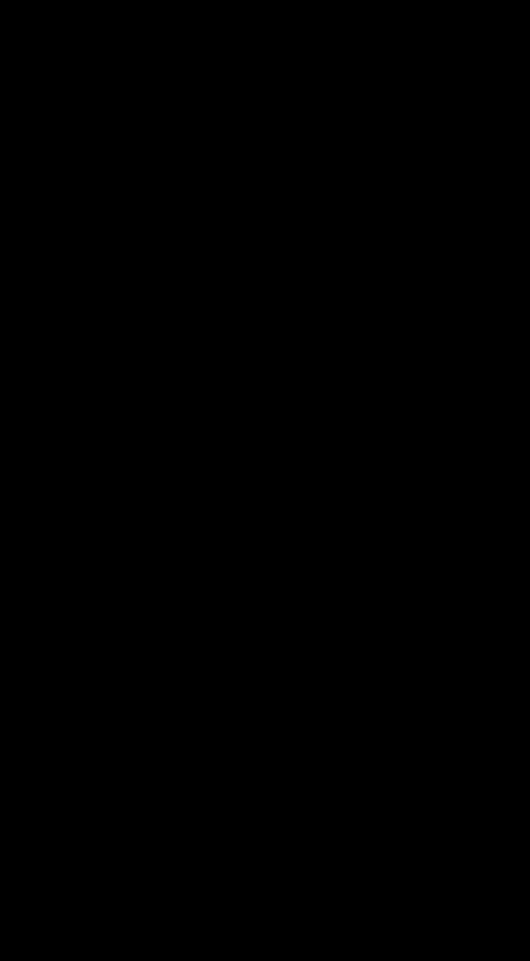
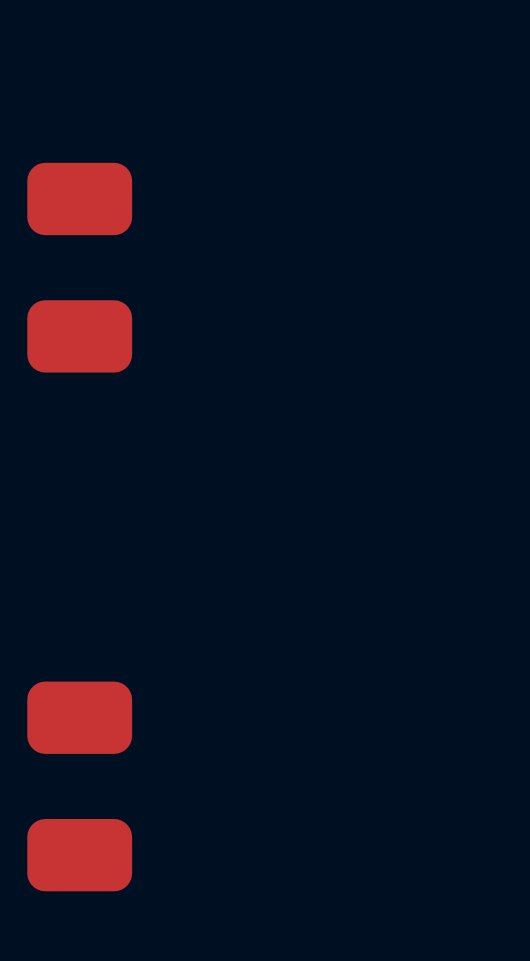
part: none -> (79, 267)
part: none -> (79, 786)

